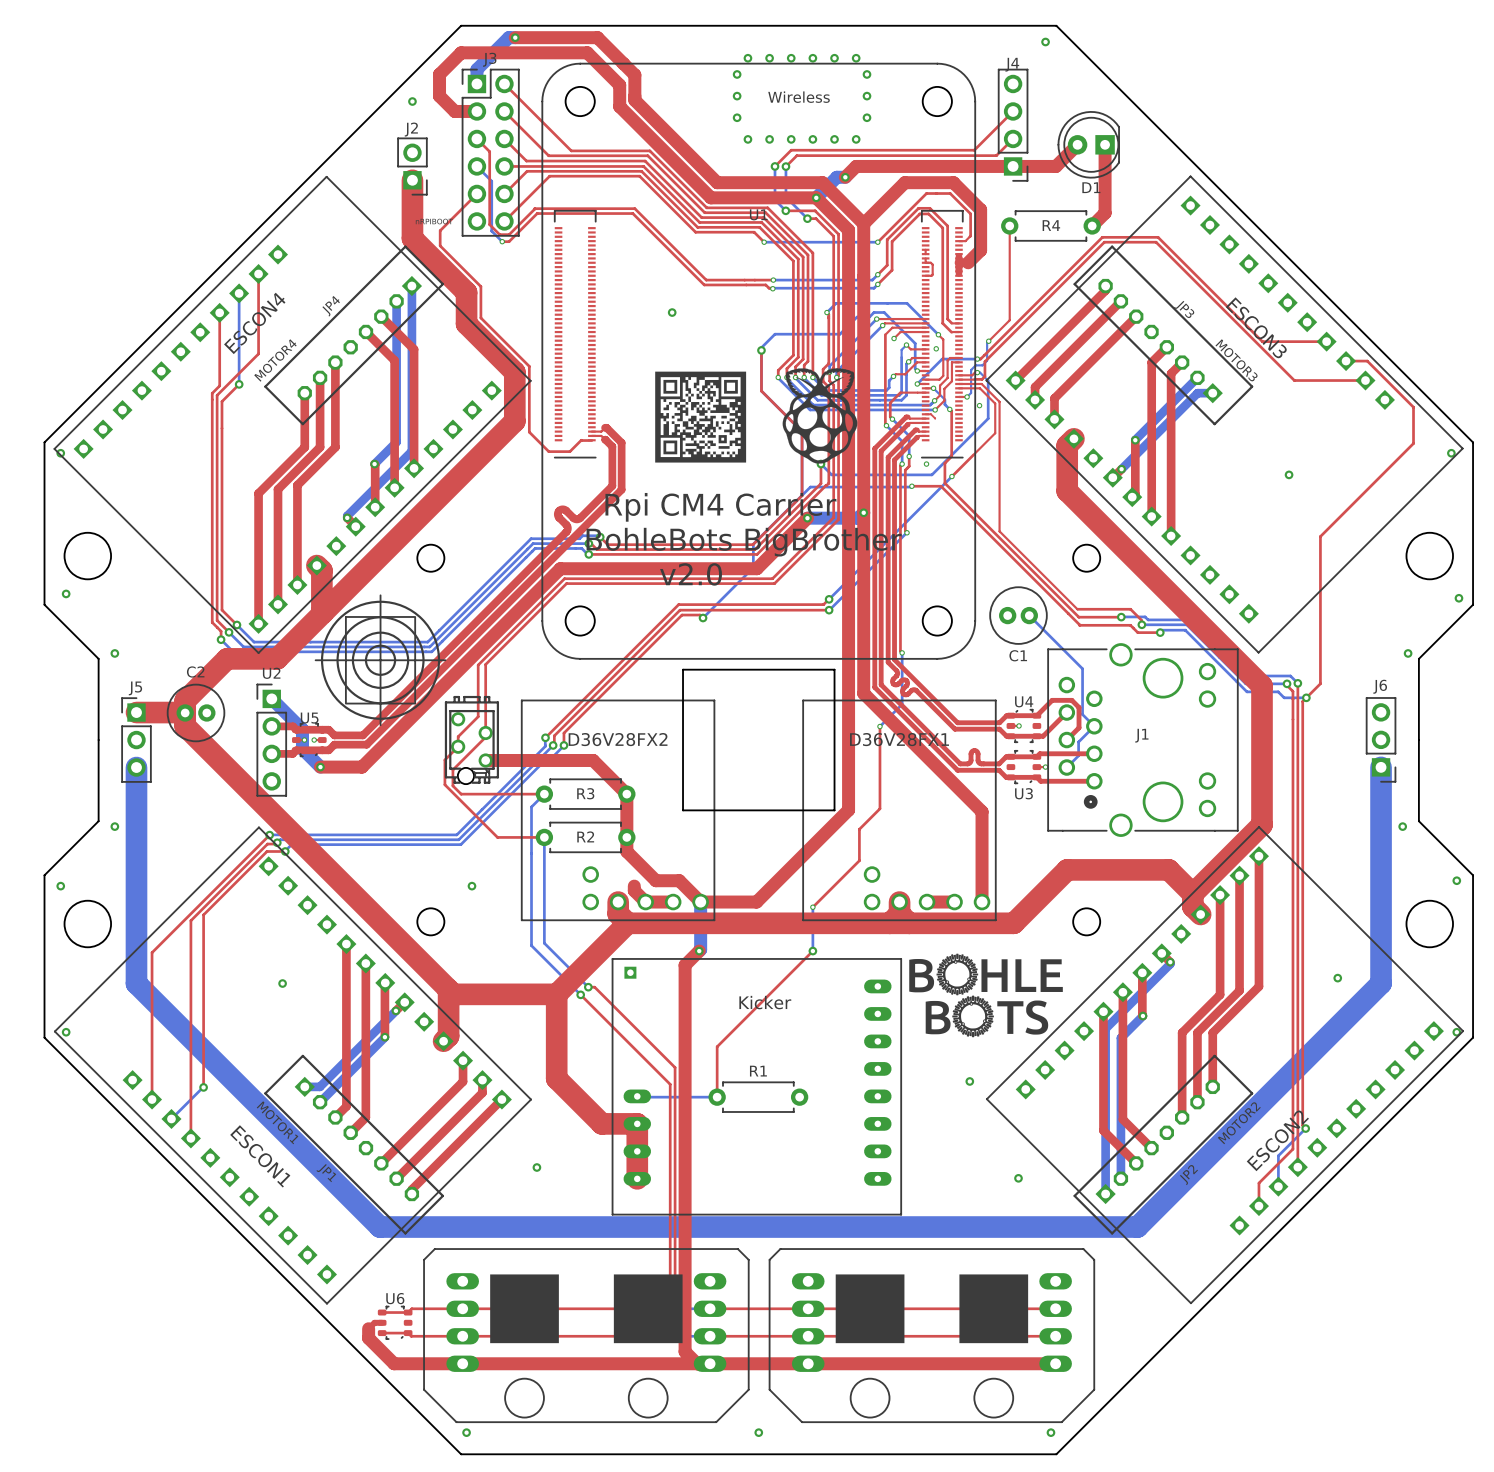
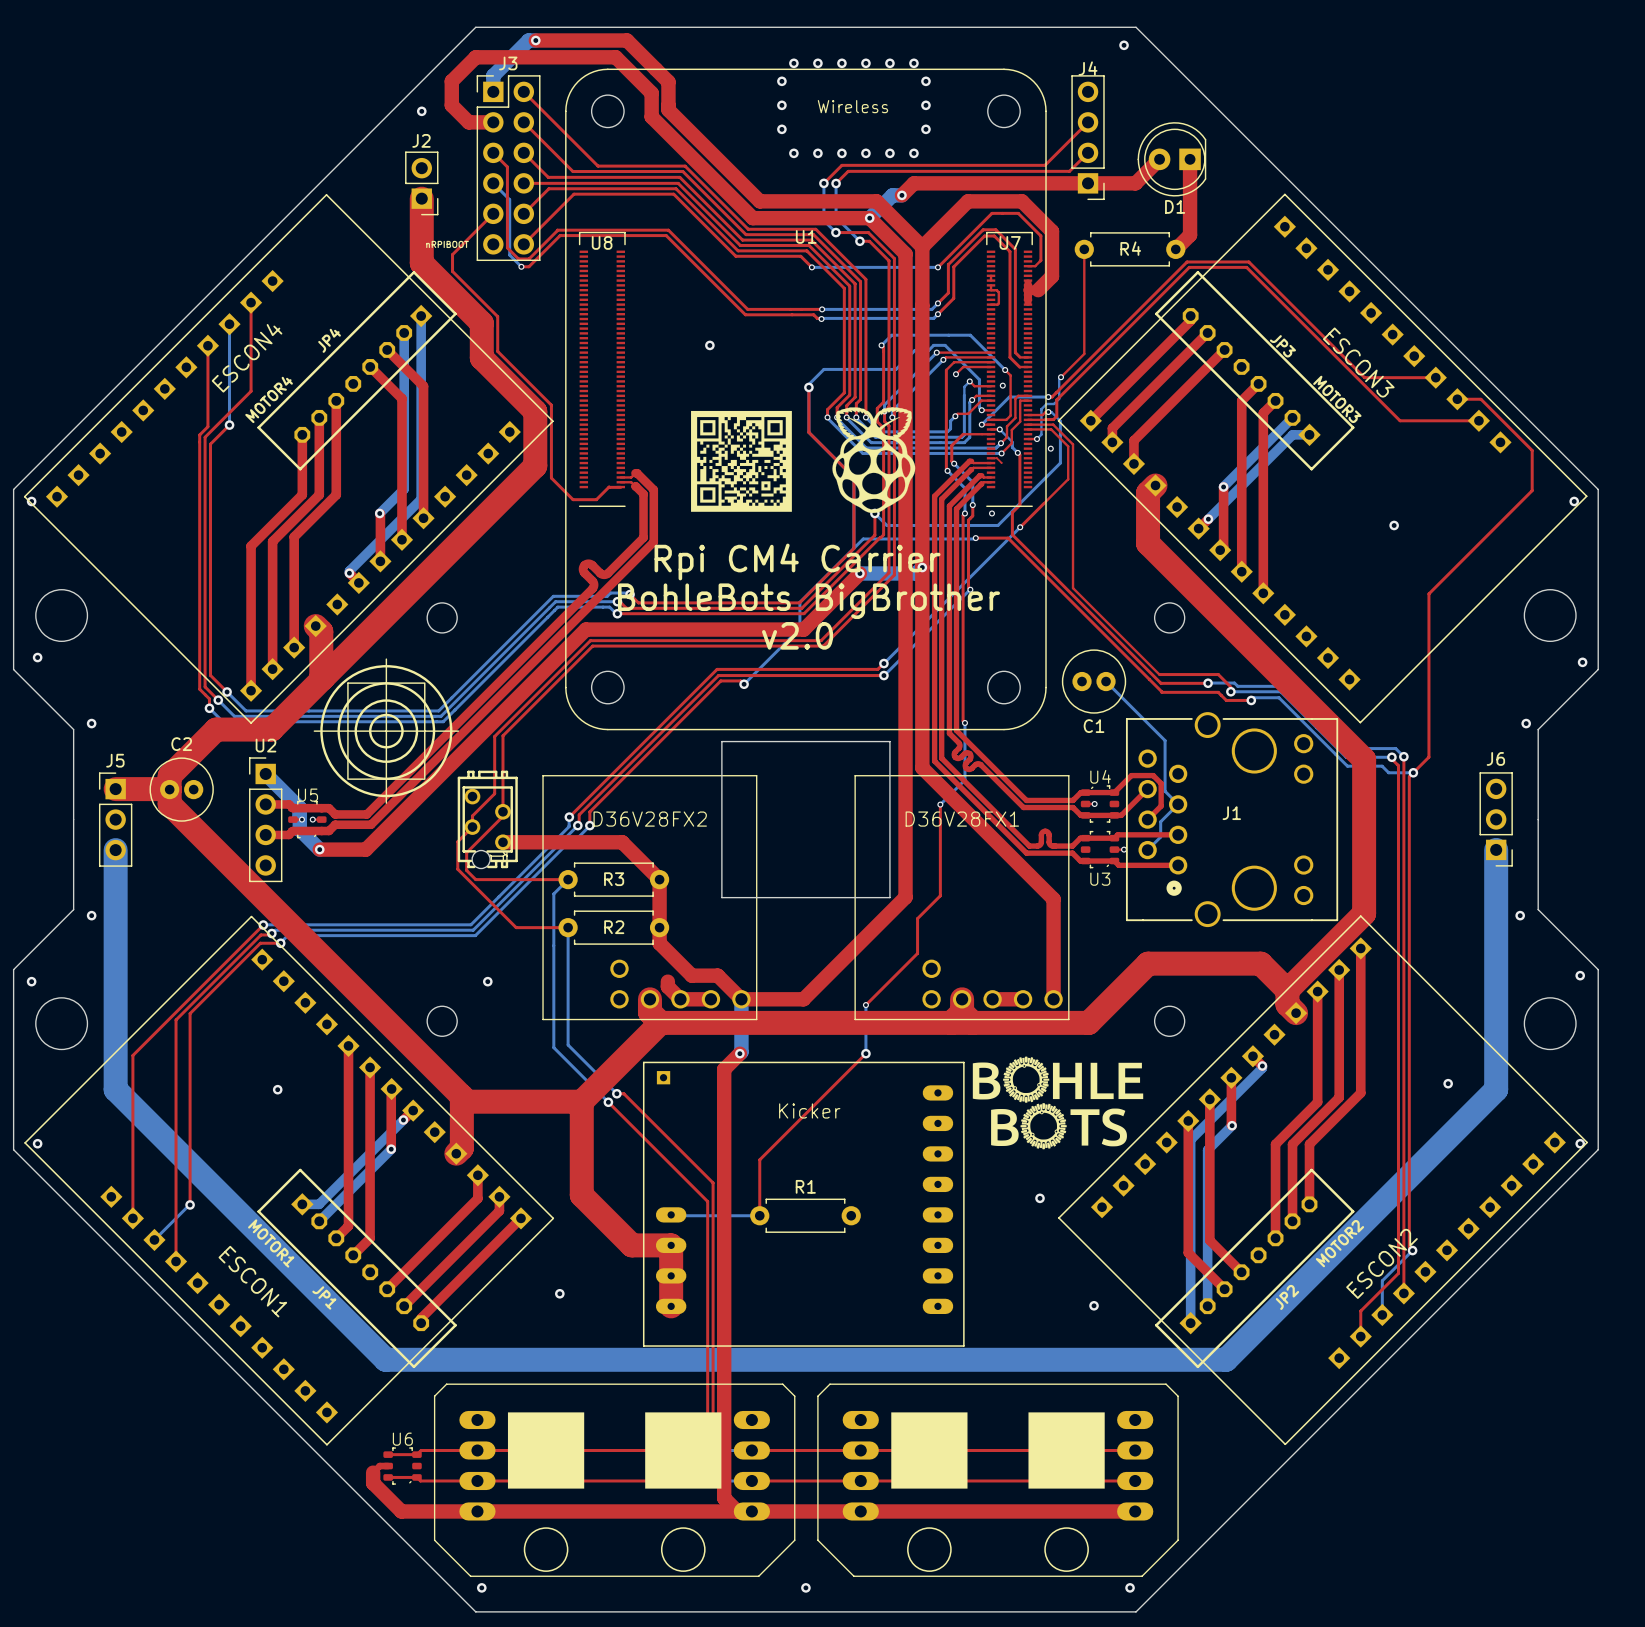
U8 name: none -> U8 (602, 242)
U7 name: none -> U7 (1010, 242)

